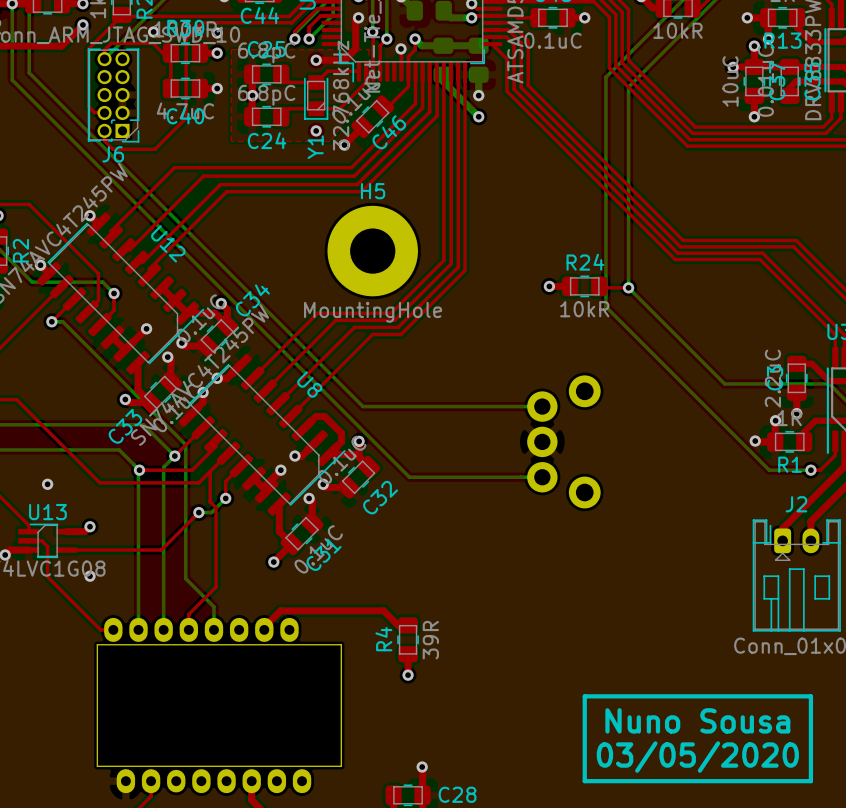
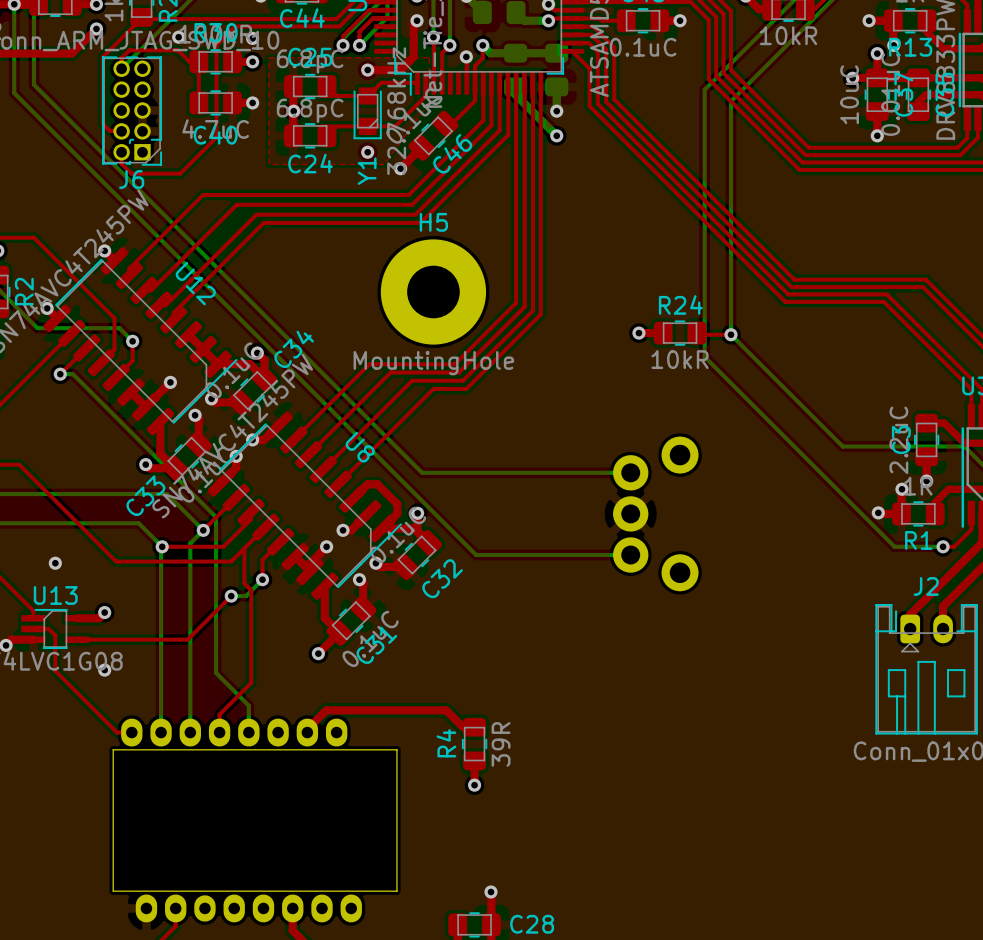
line: (584, 696) (810, 696) (810, 781) (584, 781) (584, 696) -> none
text: Nuno Sousa (697, 720) -> none
text: 03/05/2020 (697, 757) -> none

